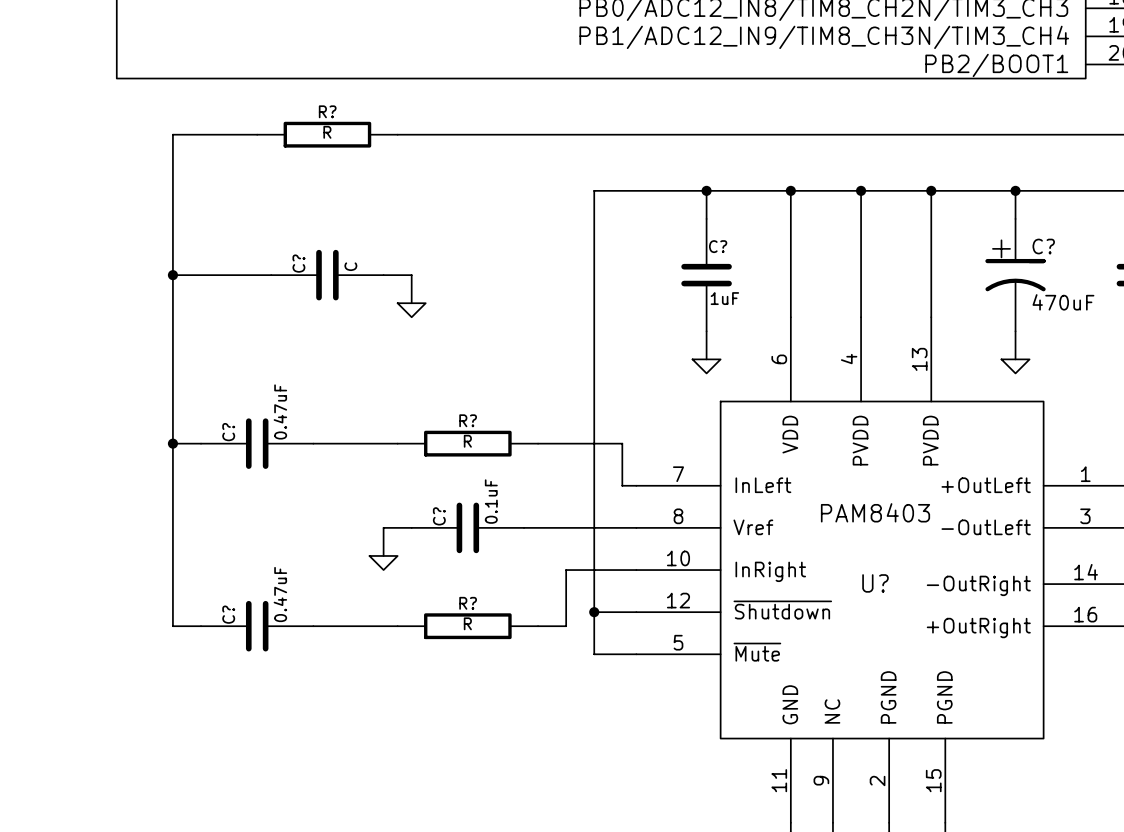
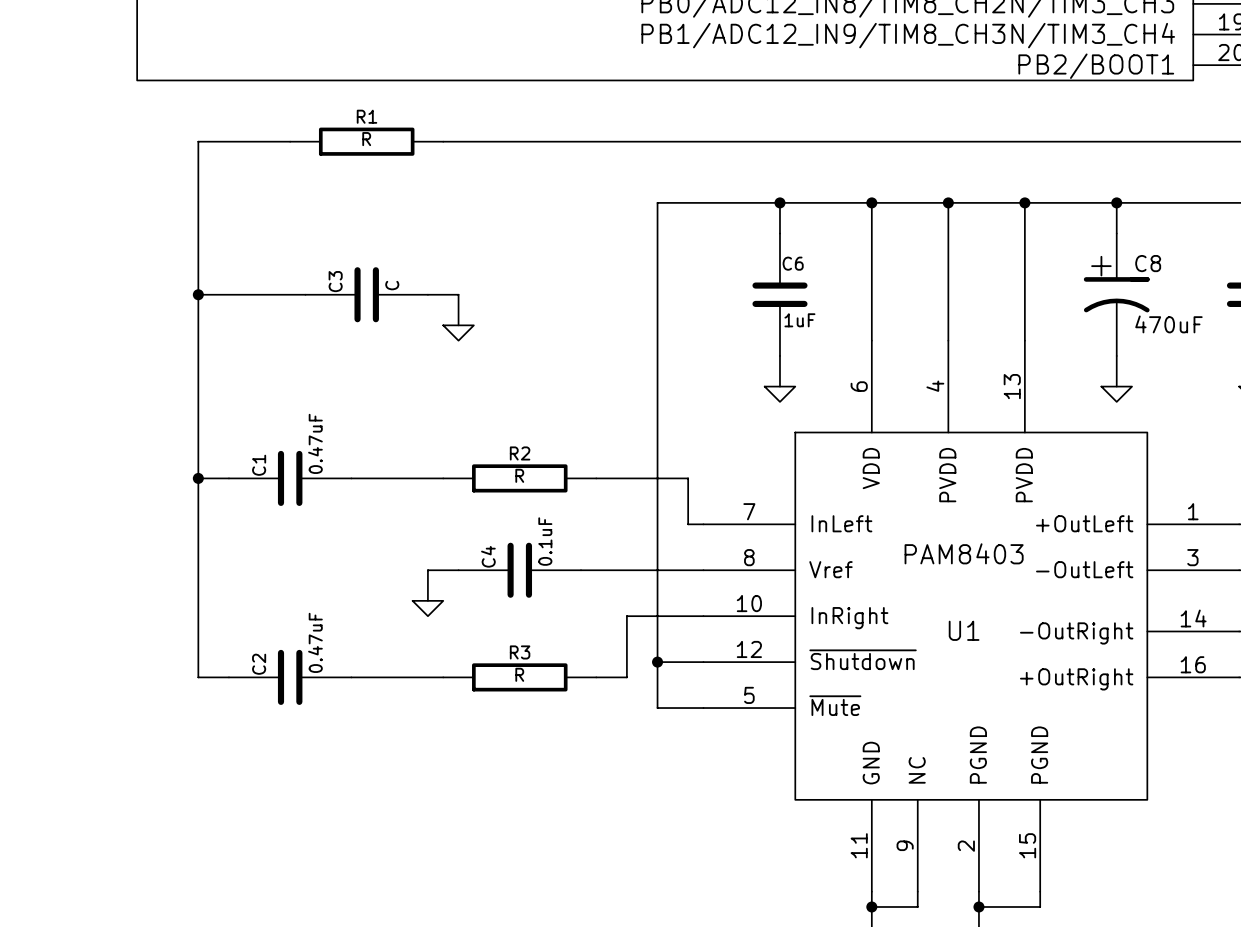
R? name: R? (327, 111) -> R1 (367, 116)
C? name: C? (718, 246) -> C6 (793, 263)
C? name: C? (1043, 246) -> C8 (1148, 263)
C? name: C? (298, 263) -> C3 (335, 281)
R? name: R? (468, 420) -> R2 (520, 453)
C? name: C? (228, 432) -> C1 (259, 465)
C? name: C? (439, 516) -> C4 (488, 556)
U? name: U? (875, 583) -> U1 (964, 630)
R? name: R? (468, 603) -> R3 (520, 652)
C? name: C? (228, 614) -> C2 (259, 664)

